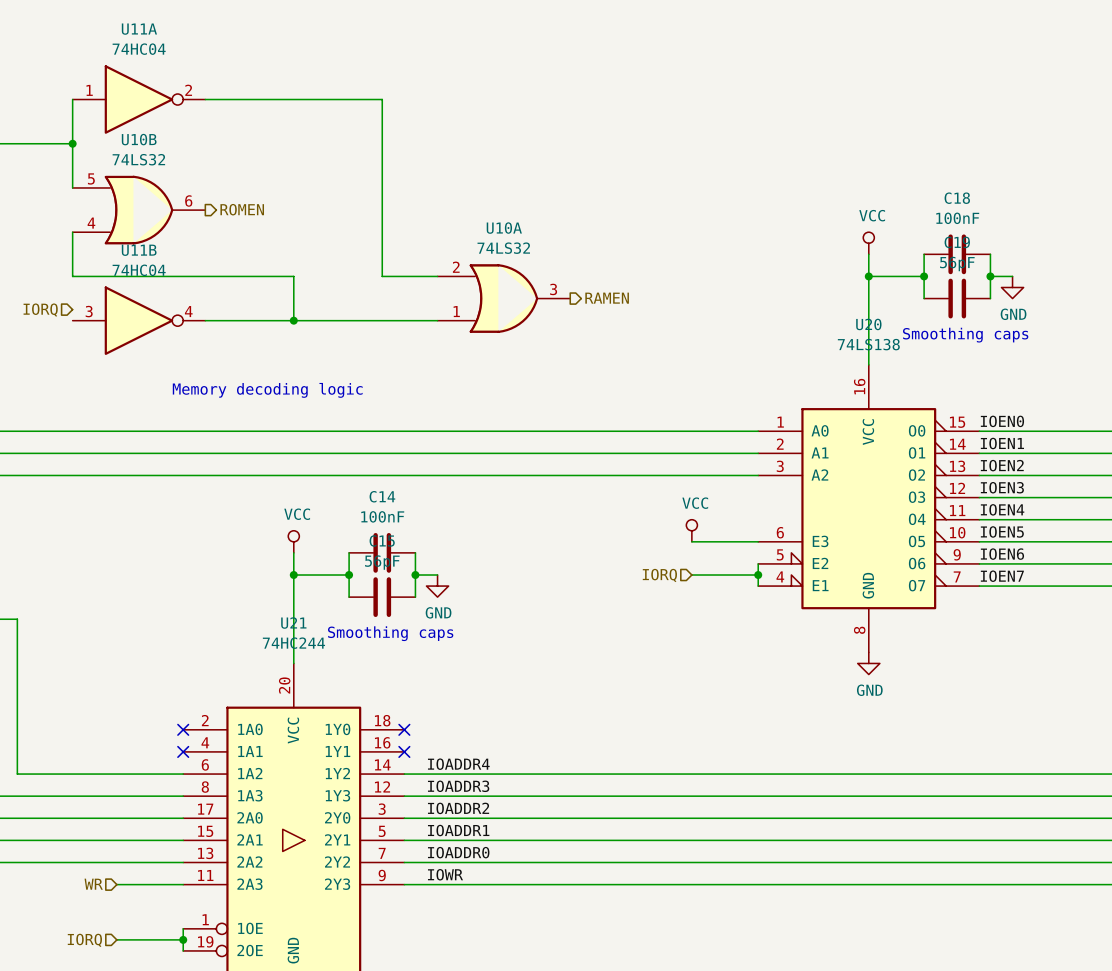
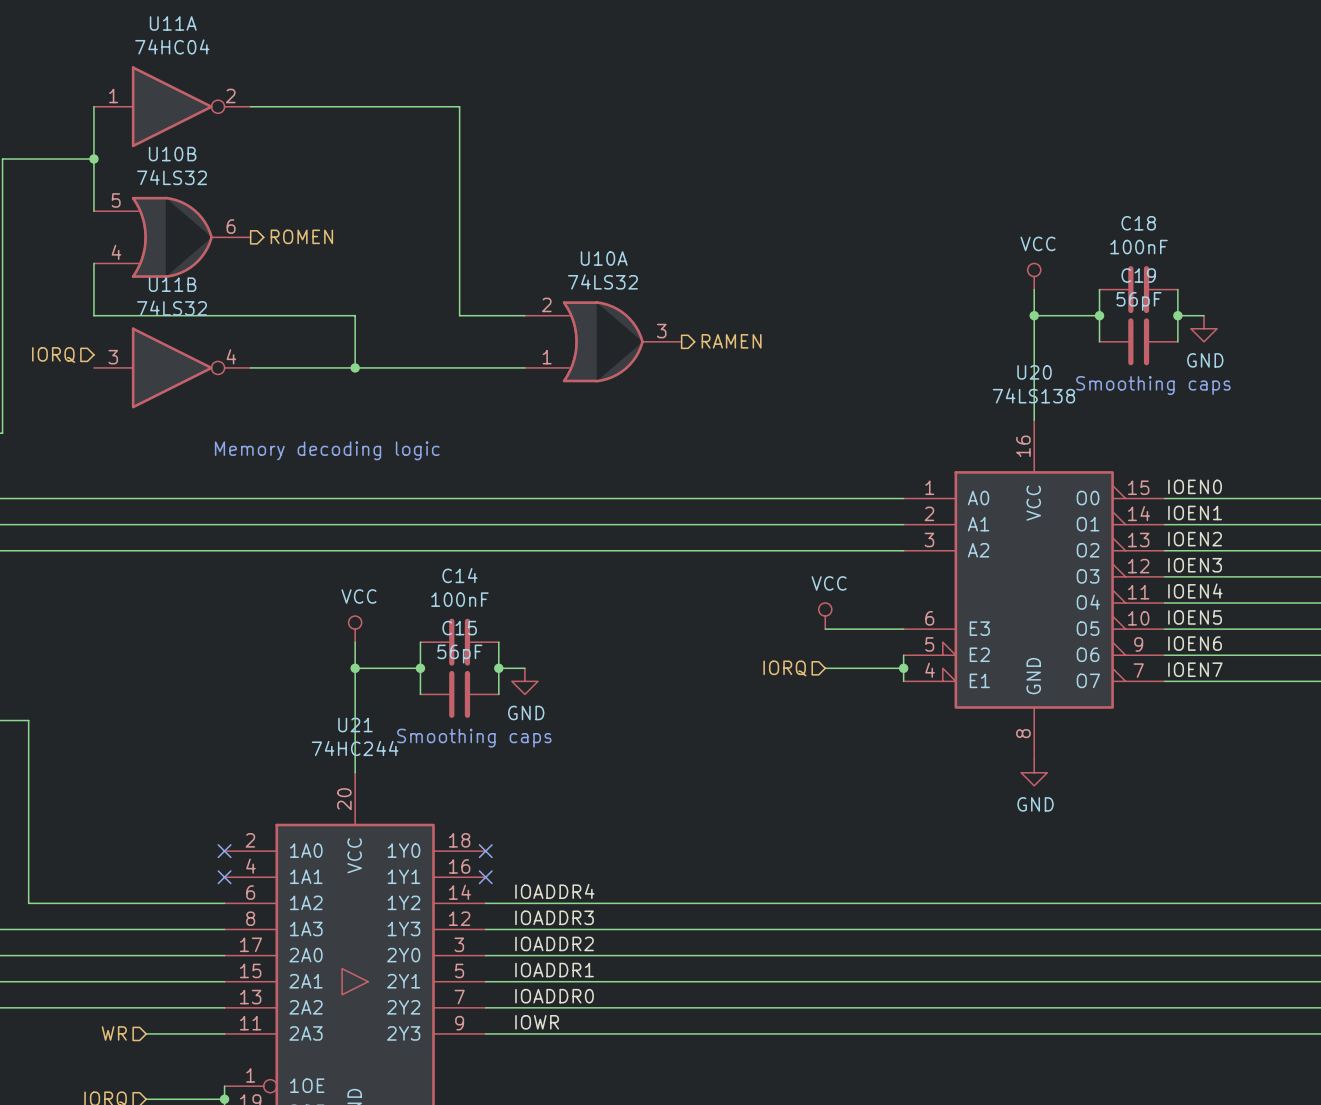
U11B value: 74HC04 (139, 270) -> 74LS32 (172, 308)

